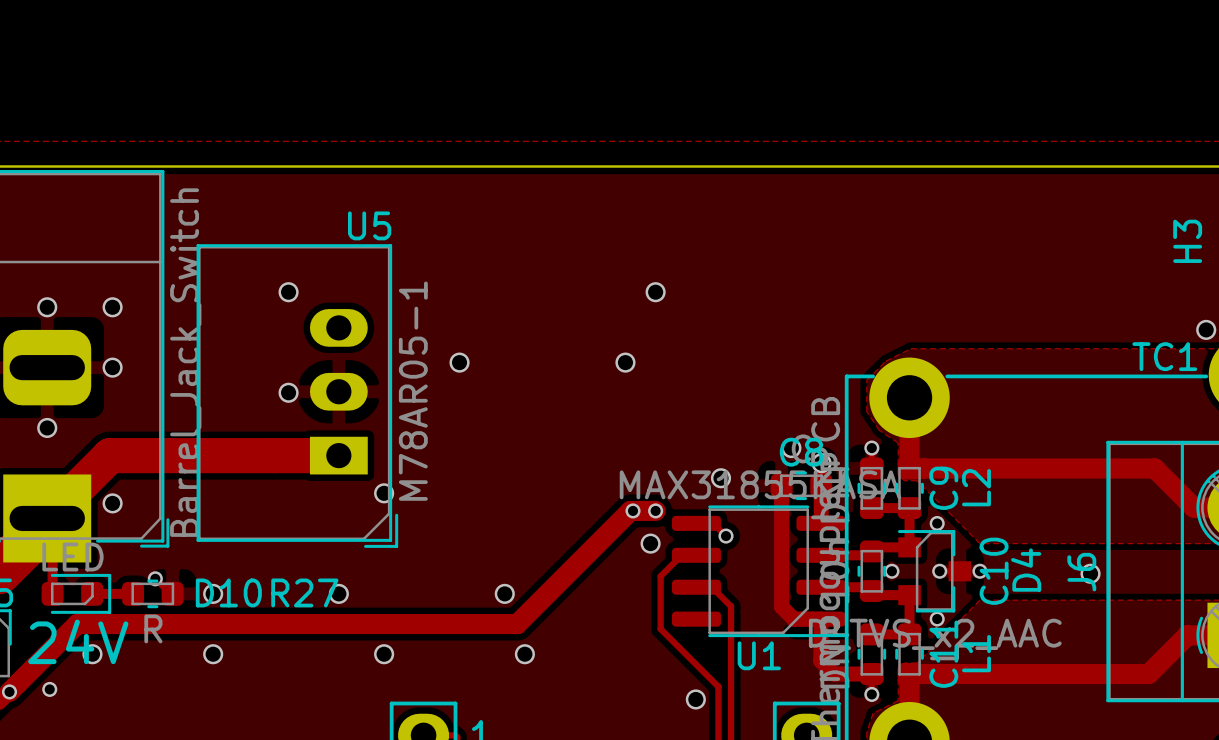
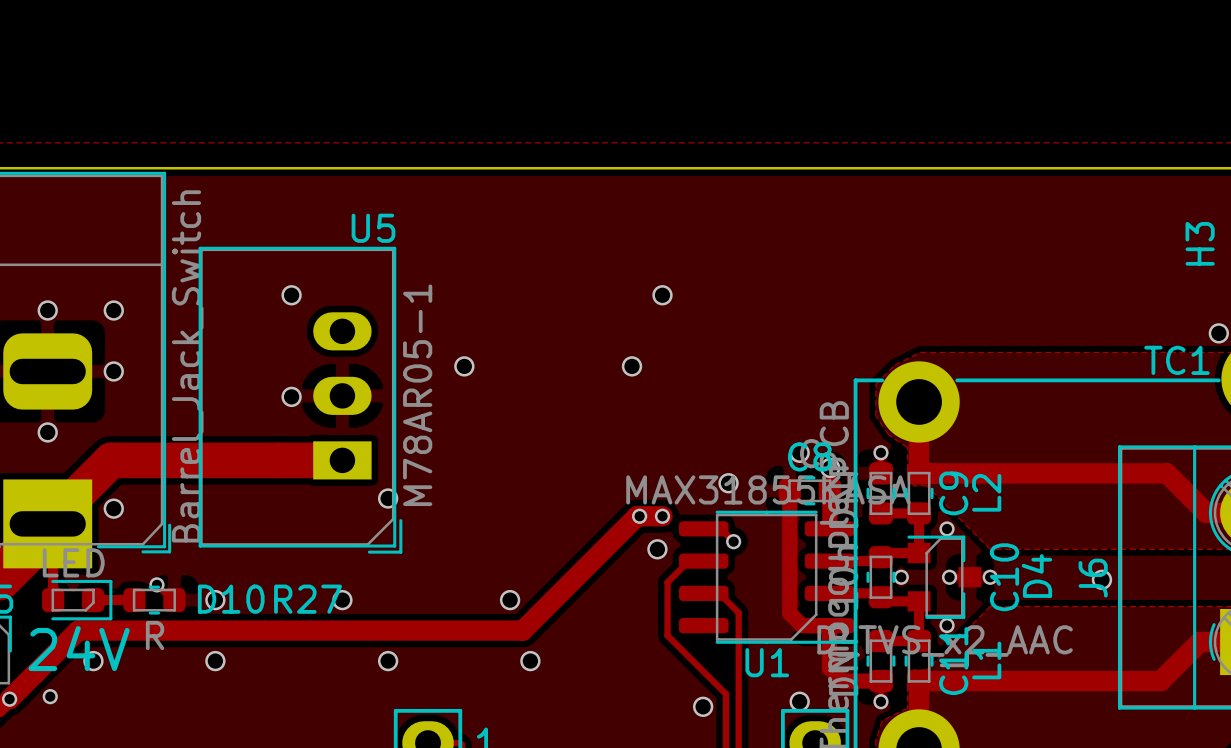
via: none -> (799, 701)

